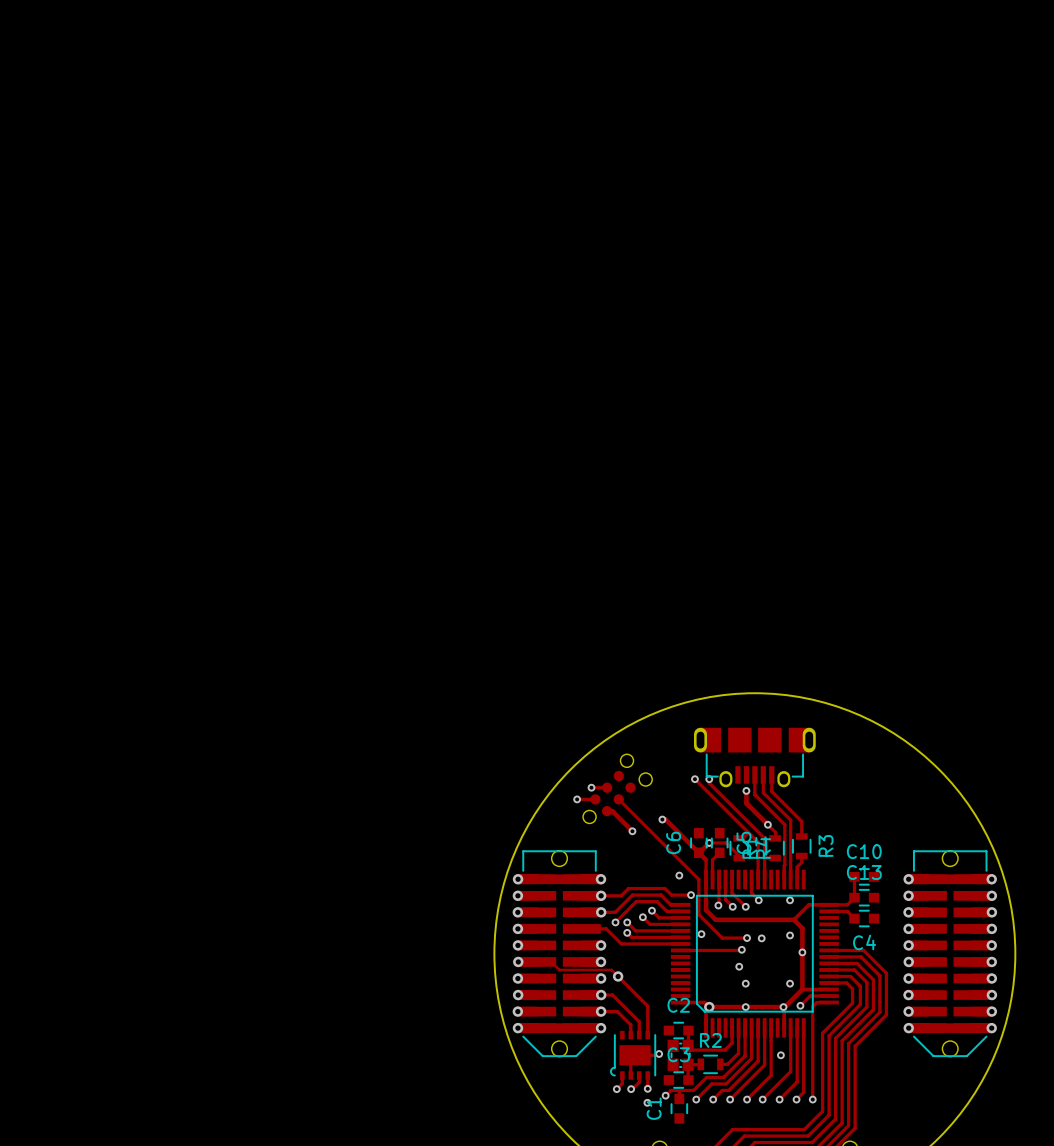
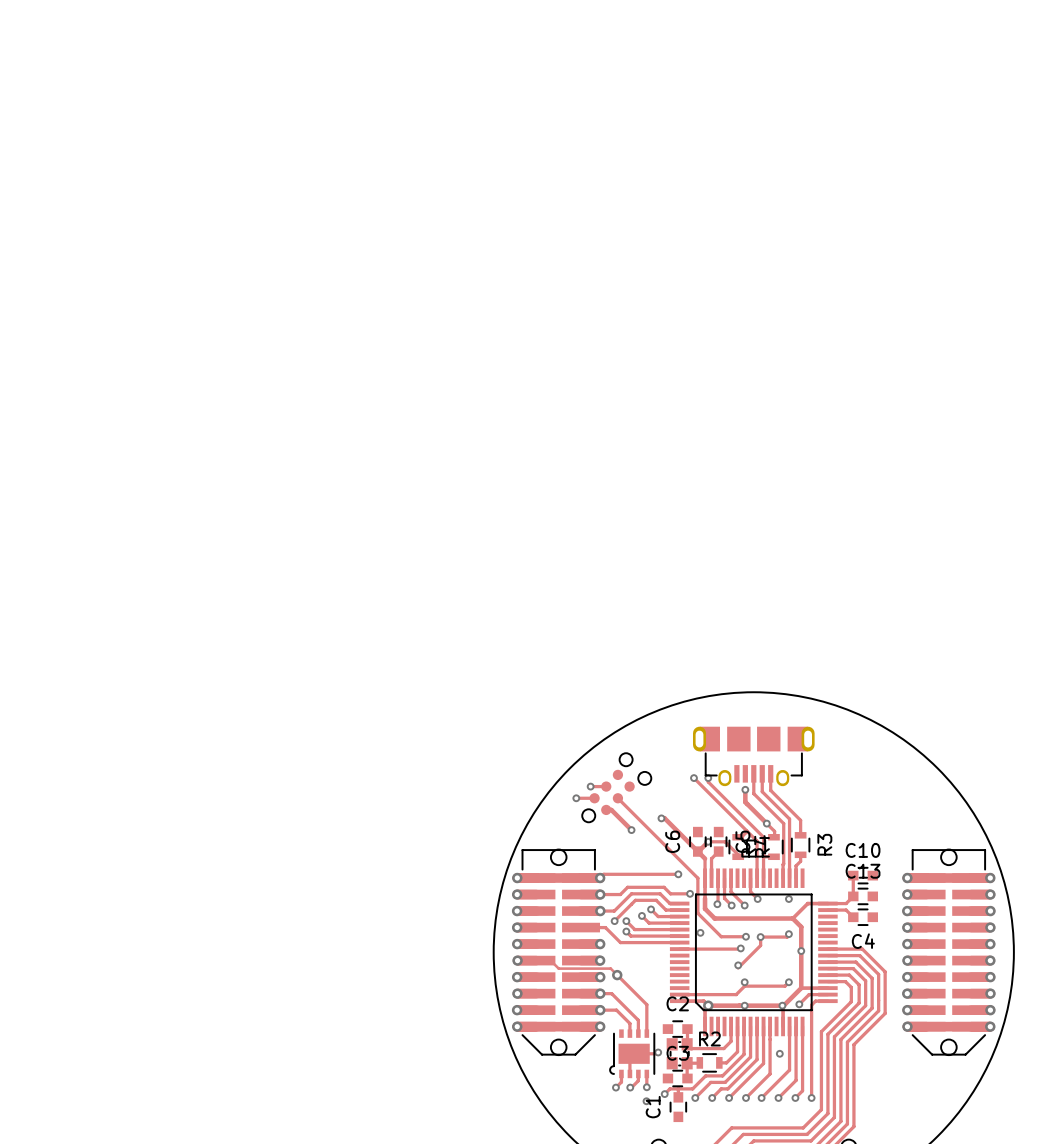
track: none -> (678, 874) (603, 874) (600, 878)
track: none -> (788, 935) (787, 937) (760, 937) (760, 945) (738, 967)
track: none -> (788, 982) (785, 986) (744, 986) (736, 994) (679, 994)

